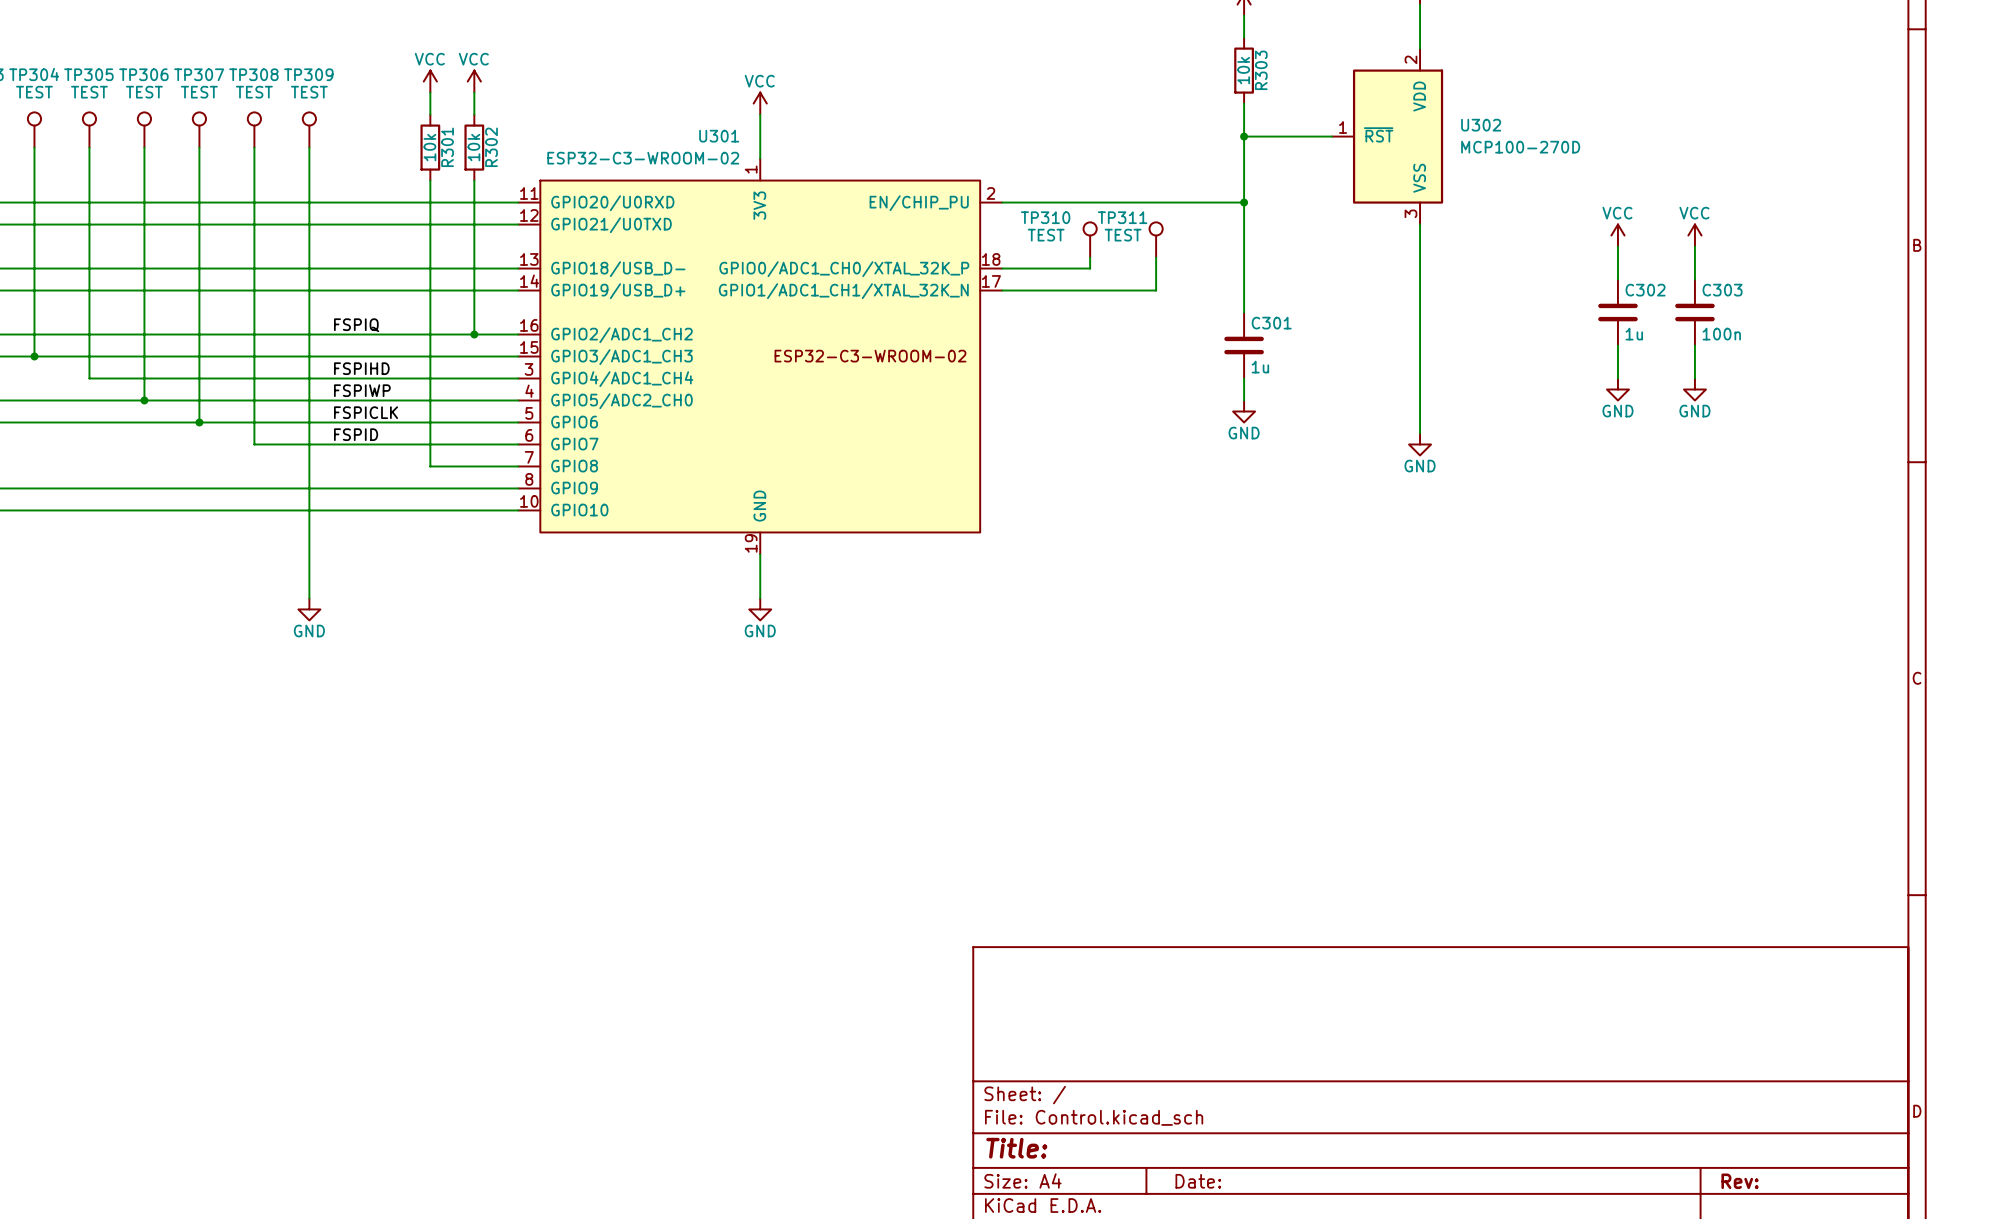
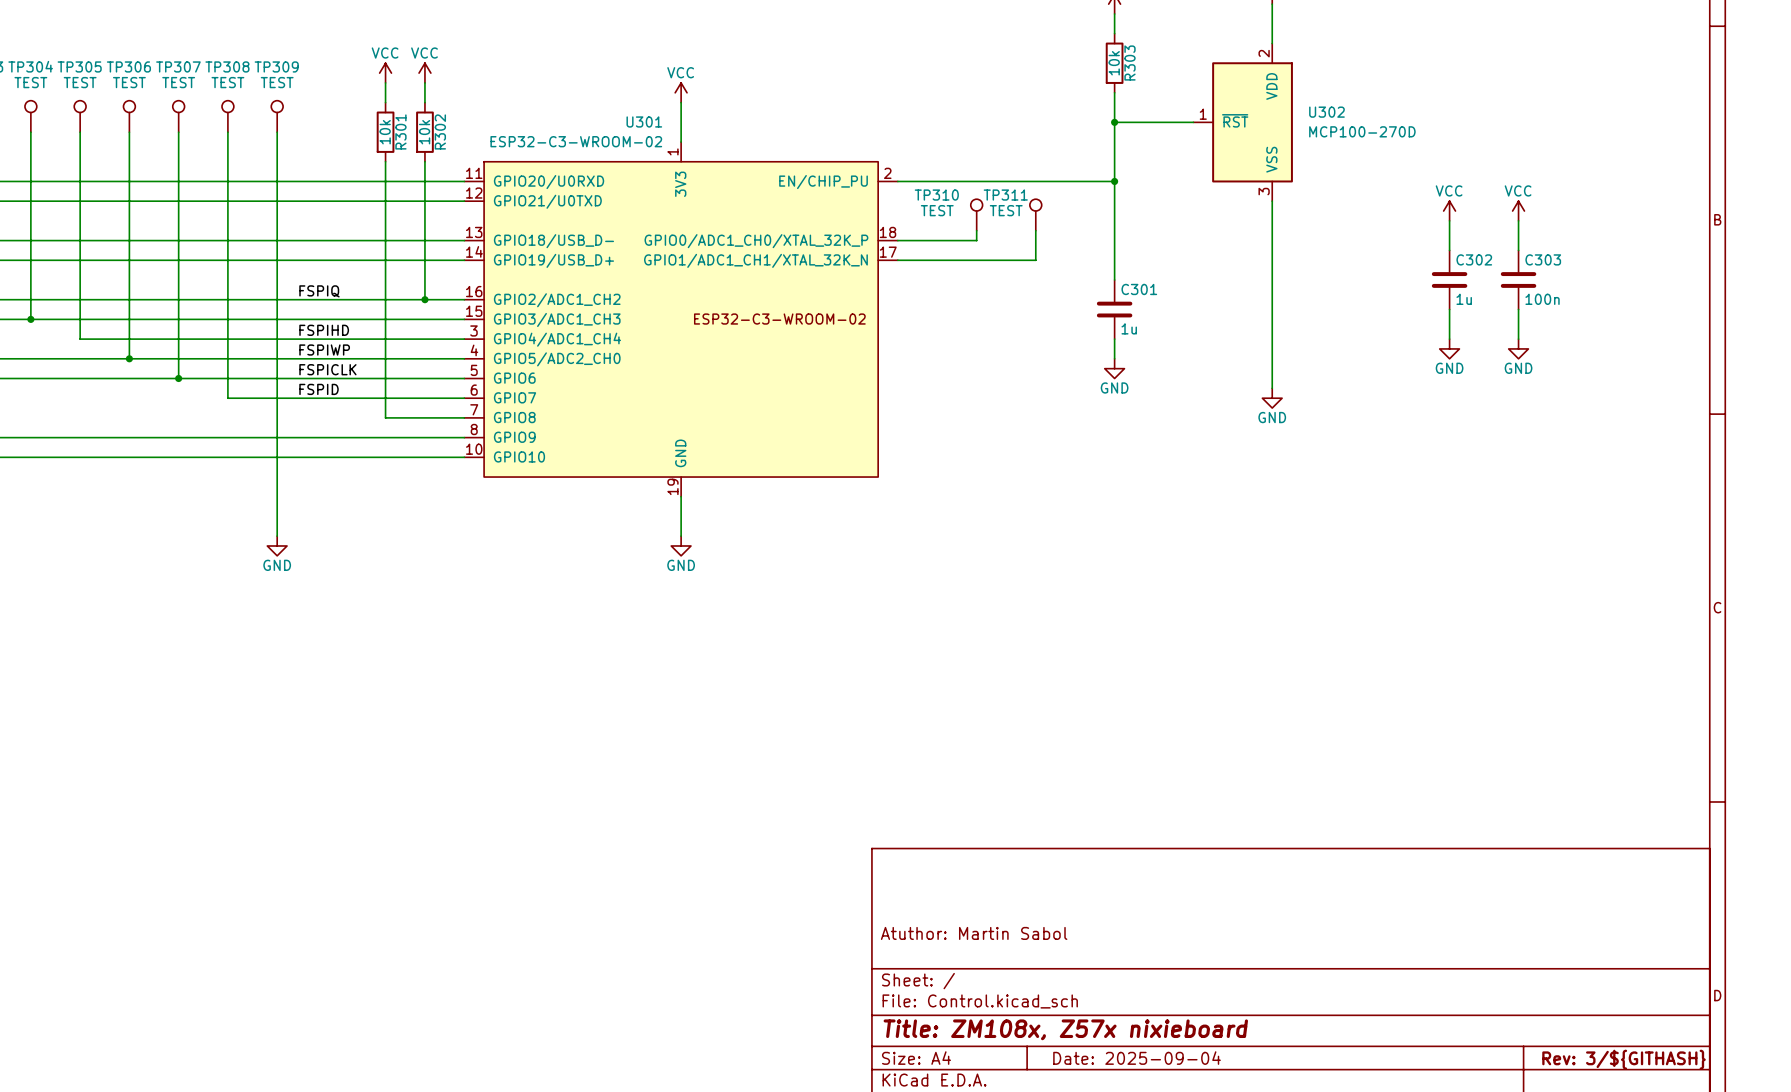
title block: none -> Atuthor: Martin Sabol (974, 933)
title block: Title: (1016, 1148) -> Title: ZM108x, Z57x nixieboard (1065, 1029)
title block: Date: (1198, 1181) -> Date: 2025-09-04 (1137, 1058)
title block: Rev: (1740, 1181) -> Rev: 3/${GITHASH} (1624, 1059)

